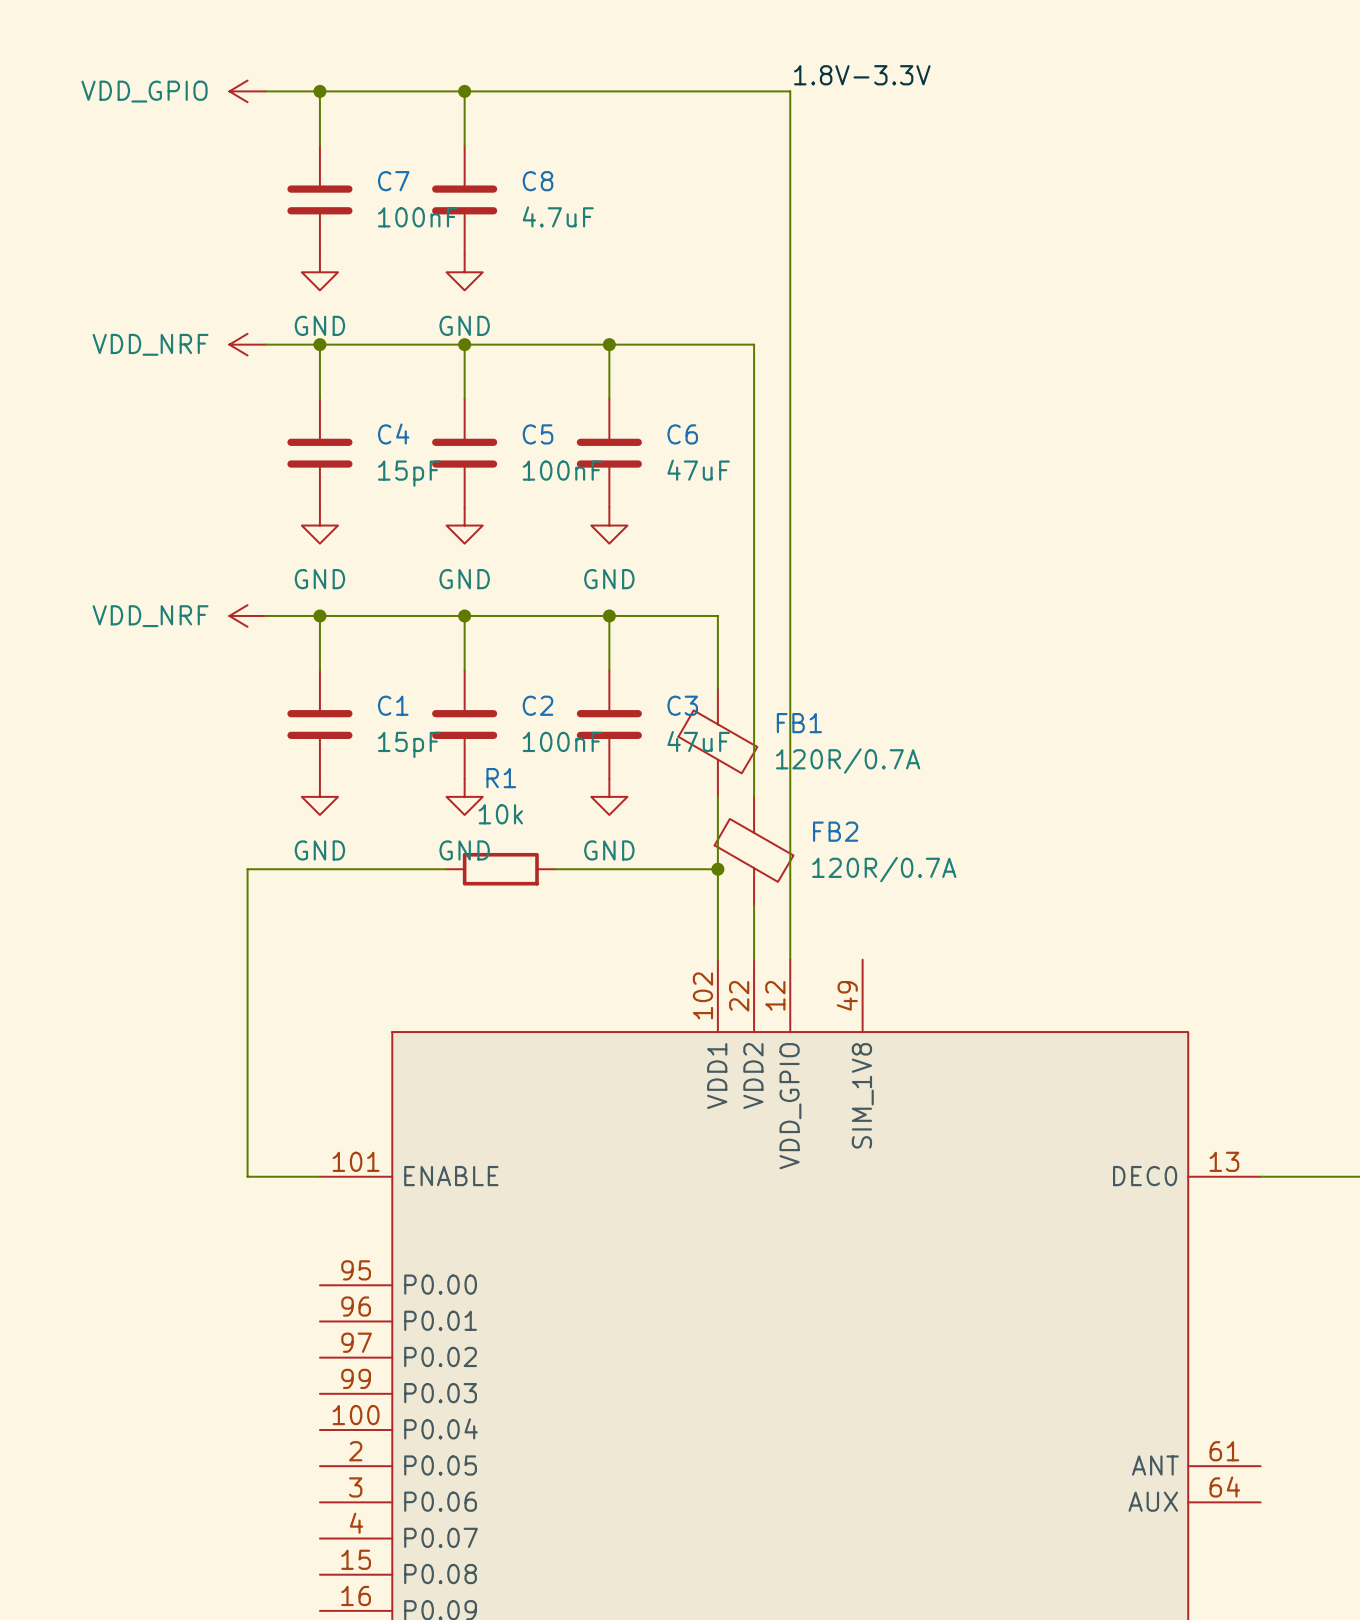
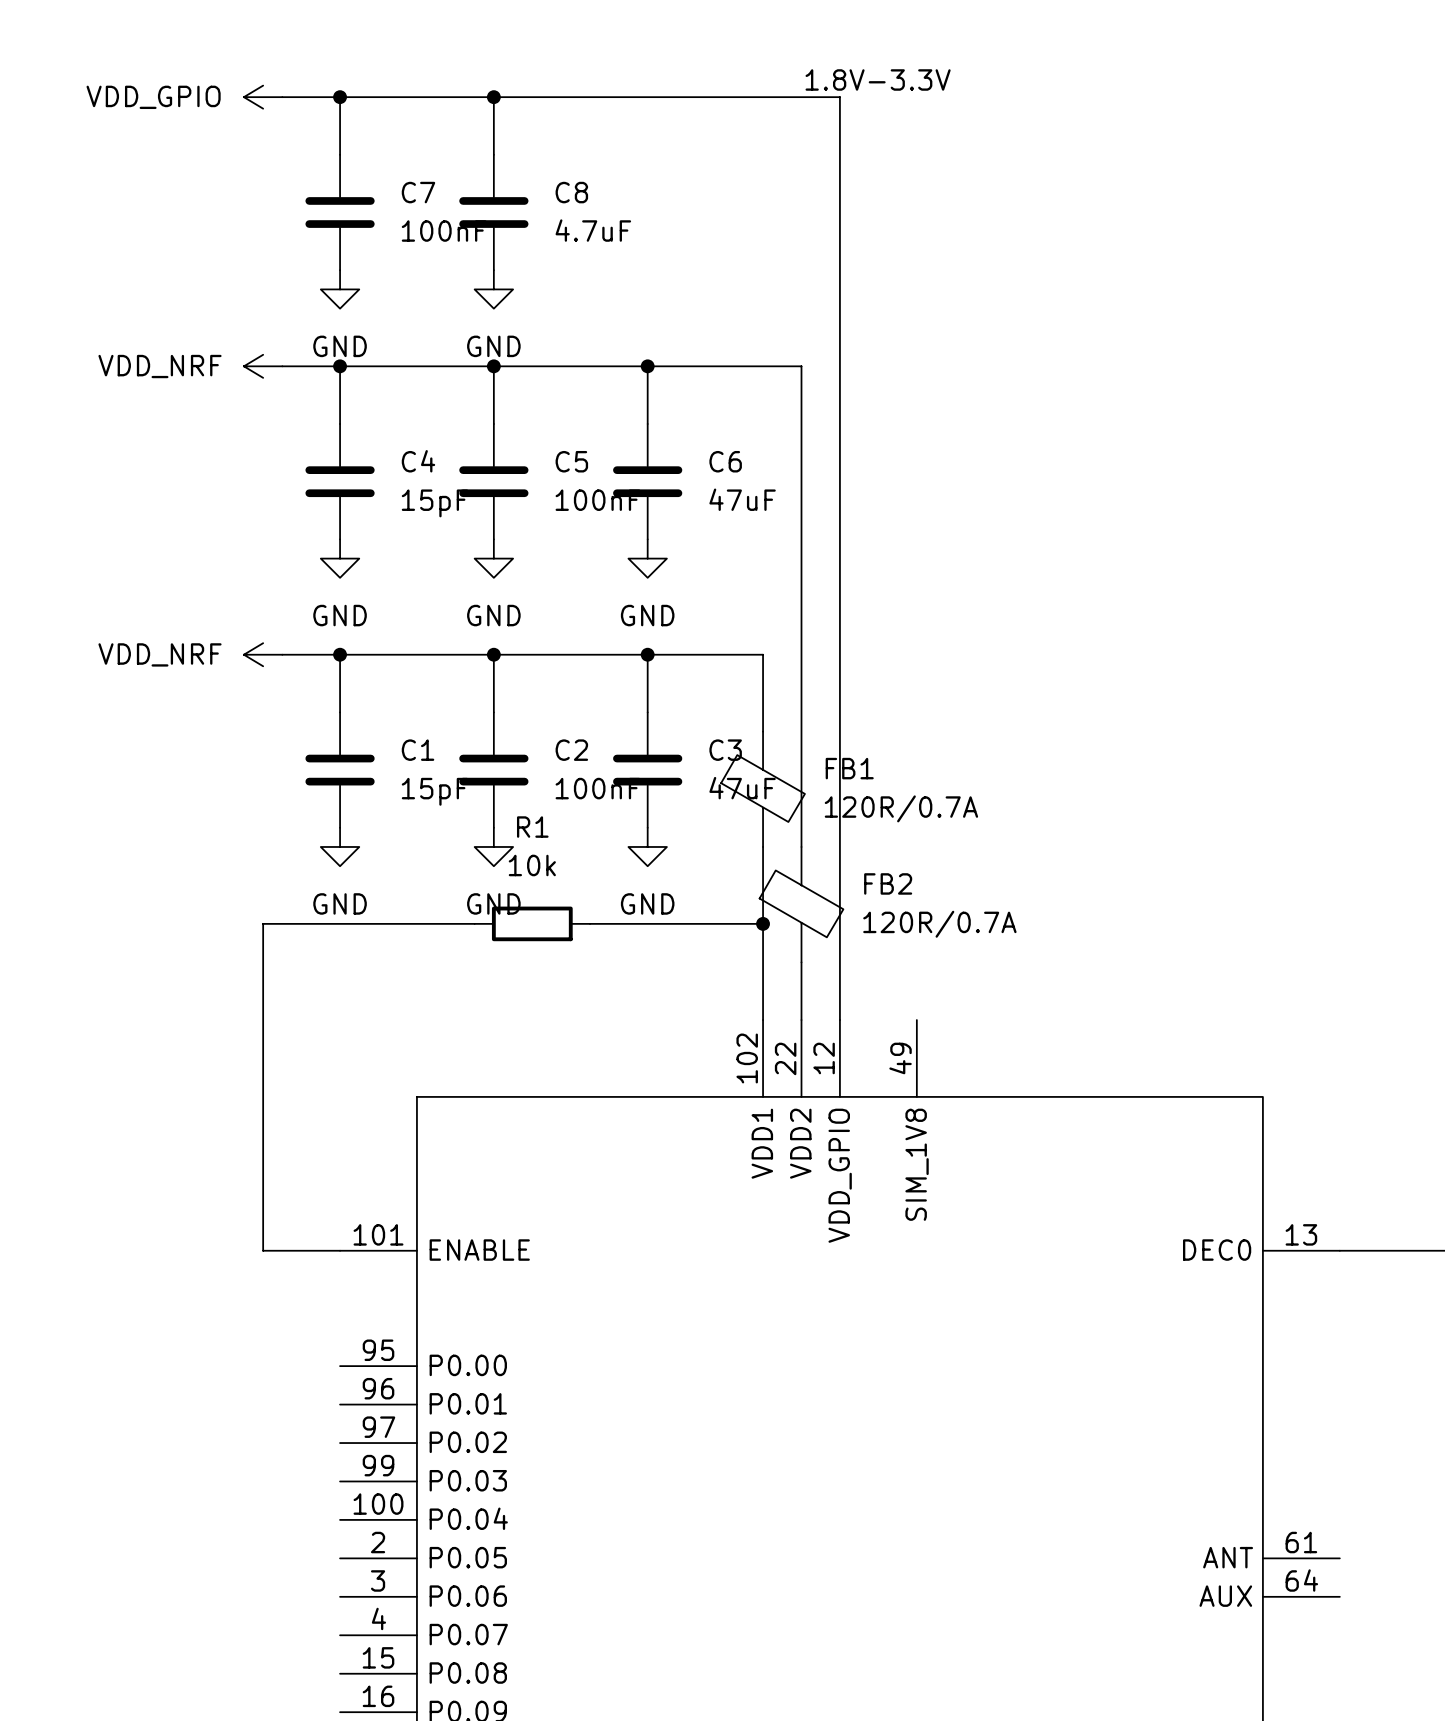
label position: 1.8V-3.3V (862, 75) -> 1.8V-3.3V (878, 79)

